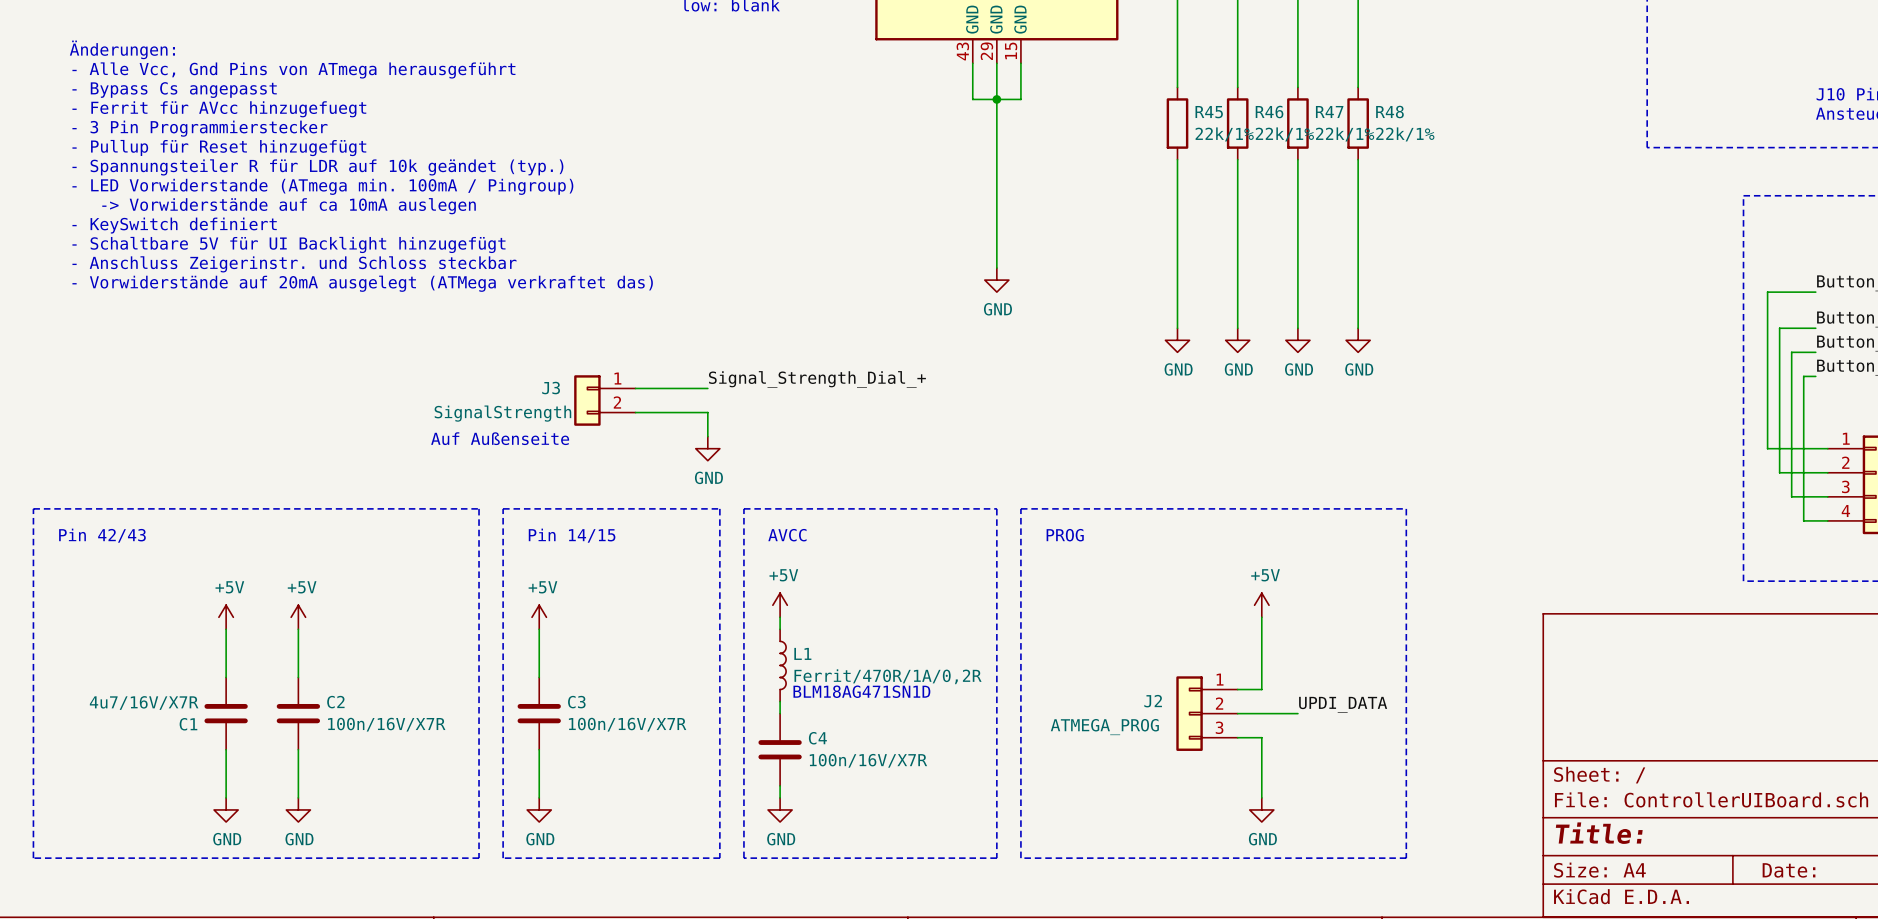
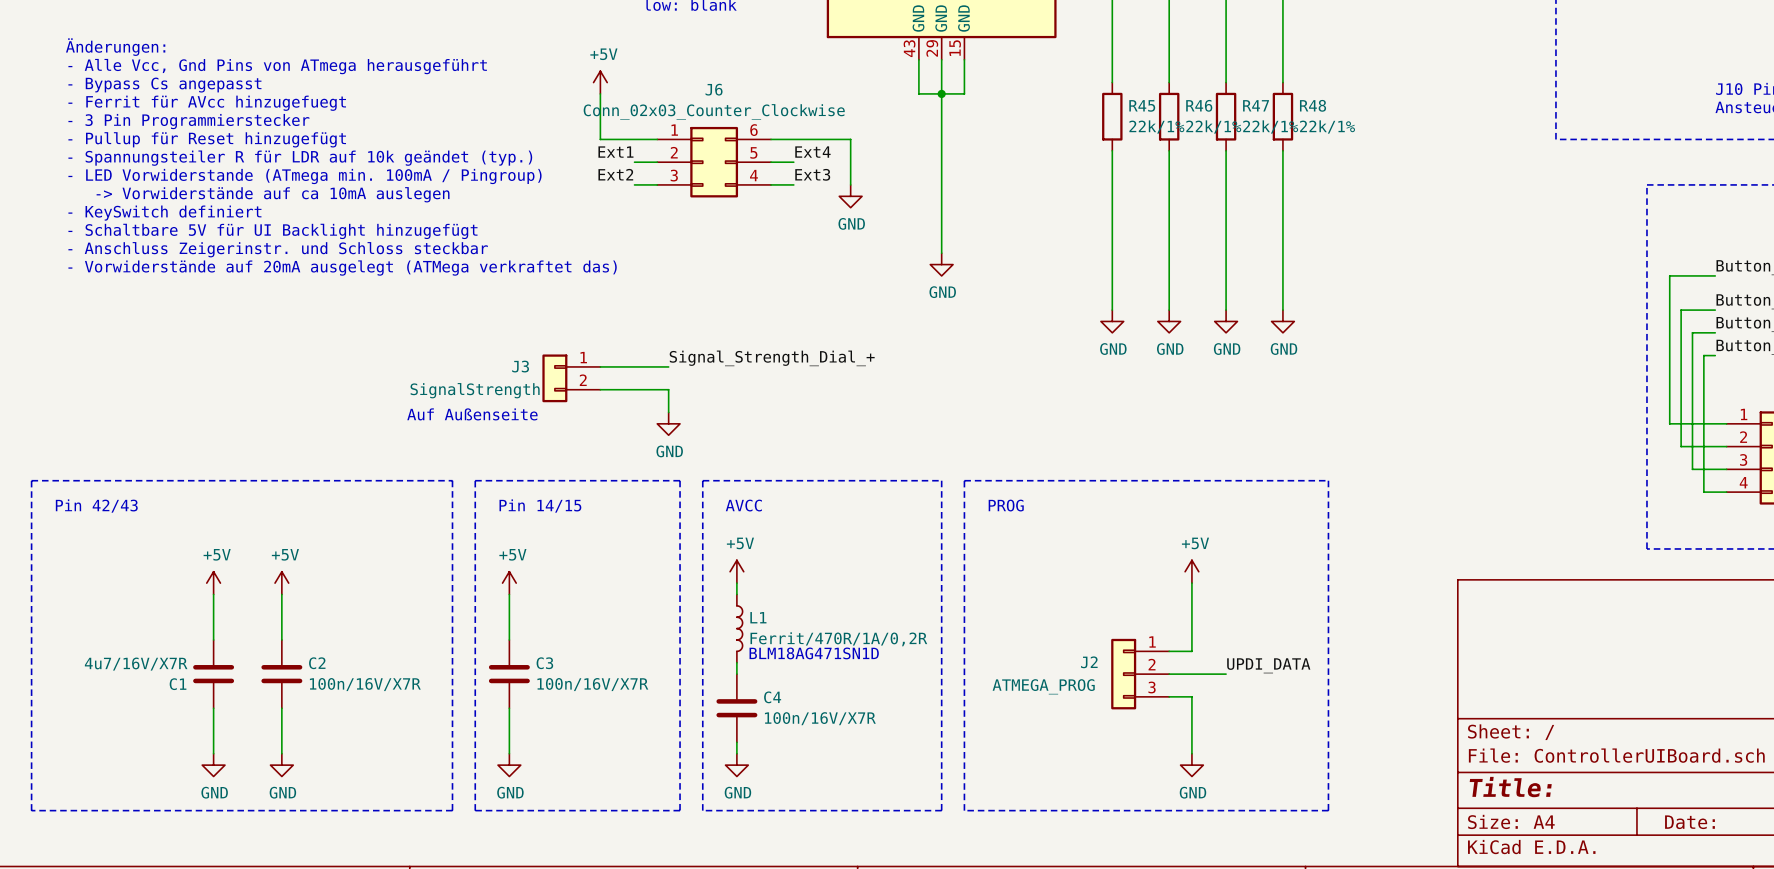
power symbol: none -> +5V (600, 82)
wire: none -> (600, 93) (600, 139) (657, 139)
wire: none -> (771, 139) (850, 139) (850, 184)
label: none -> Ext1 (615, 152)
label: none -> Ext4 (812, 152)
wire: none -> (634, 162) (657, 162)
J6: none -> Conn_02x03_Counter_Clockwise (714, 162)
wire: none -> (771, 162) (793, 162)
label: none -> Ext2 (615, 174)
label: none -> Ext3 (812, 174)
wire: none -> (634, 184) (657, 184)
wire: none -> (771, 184) (793, 184)
power symbol: none -> GND (850, 196)

